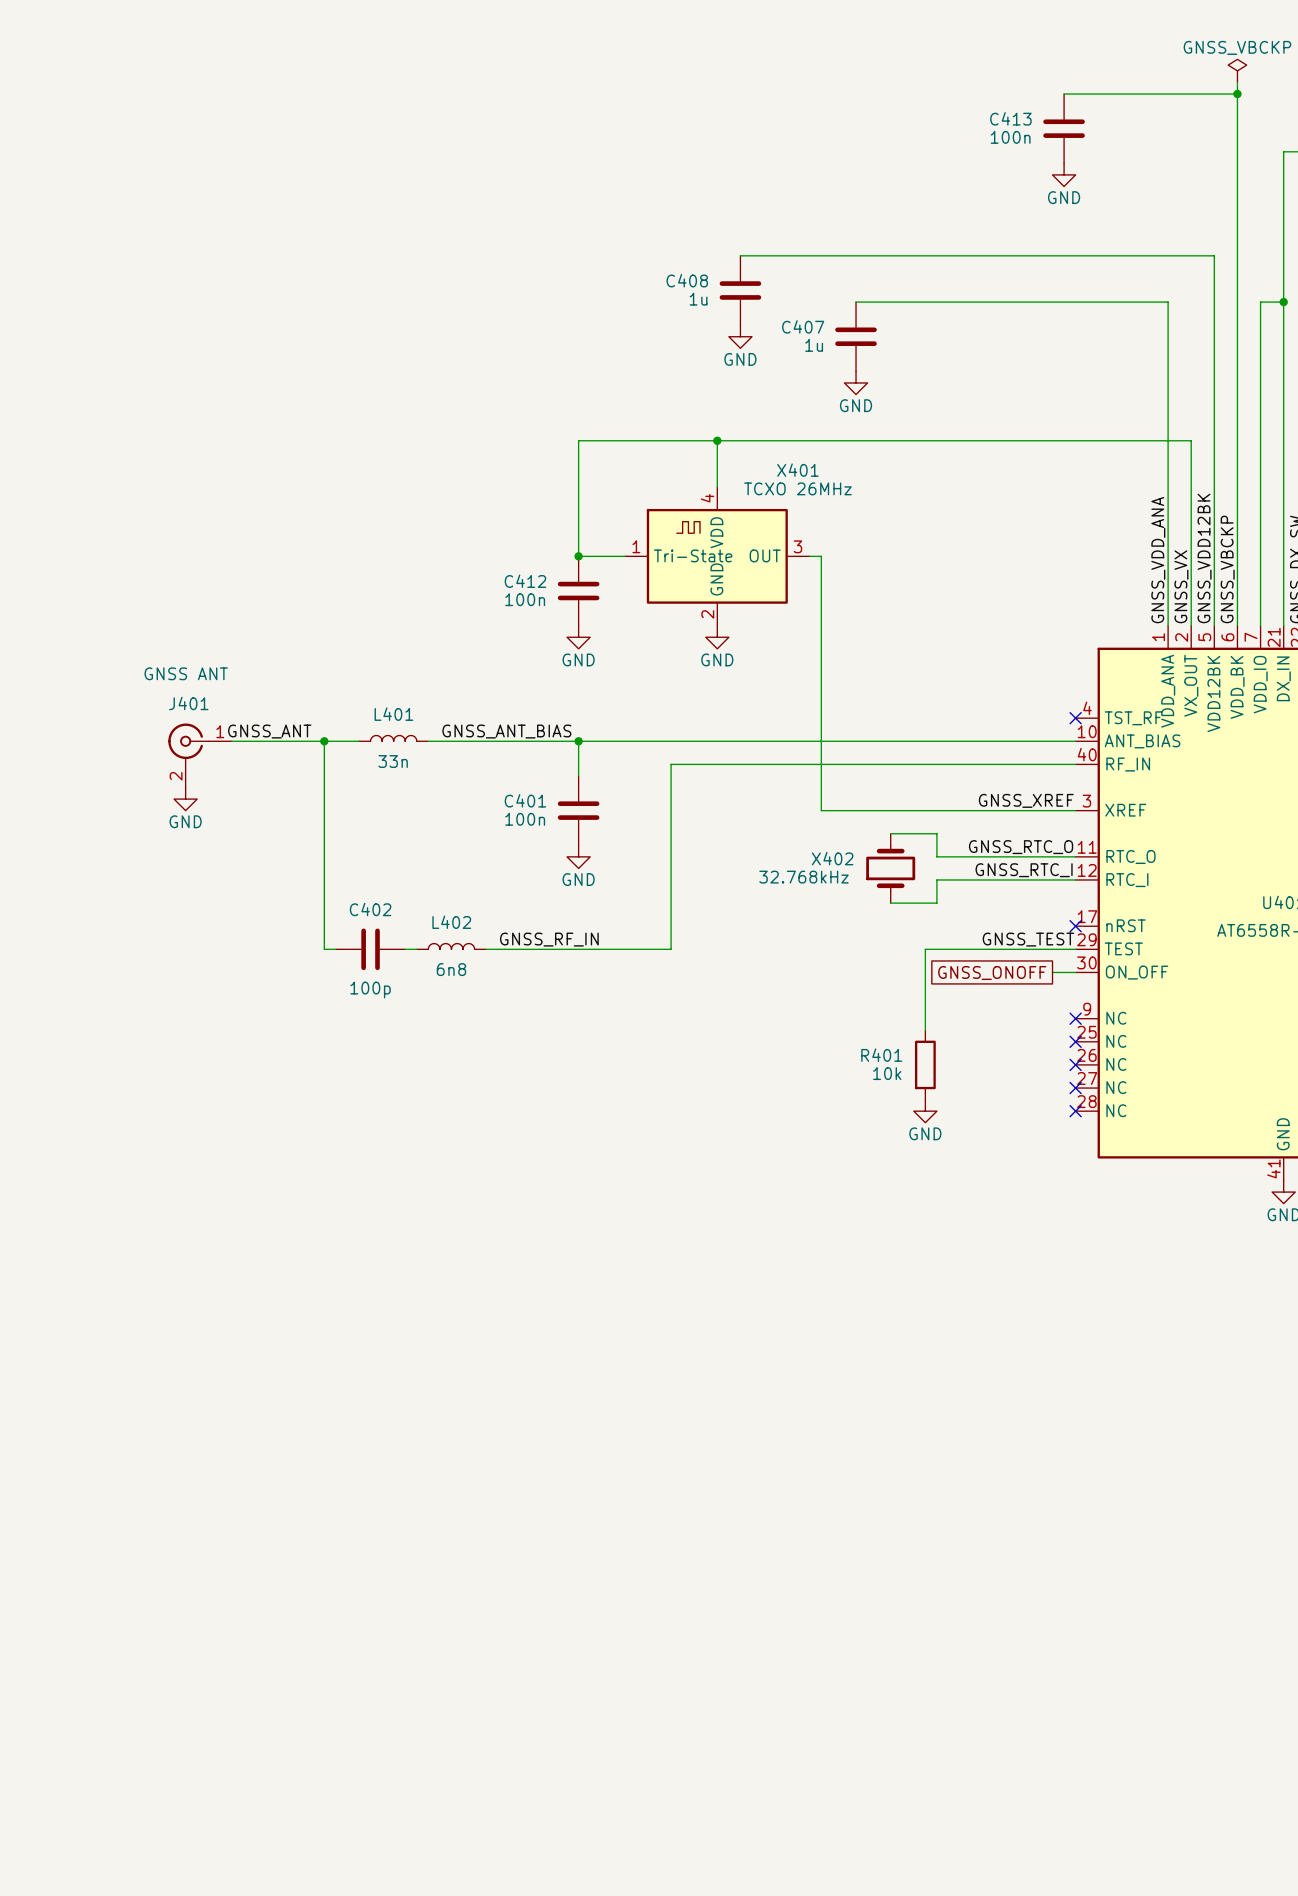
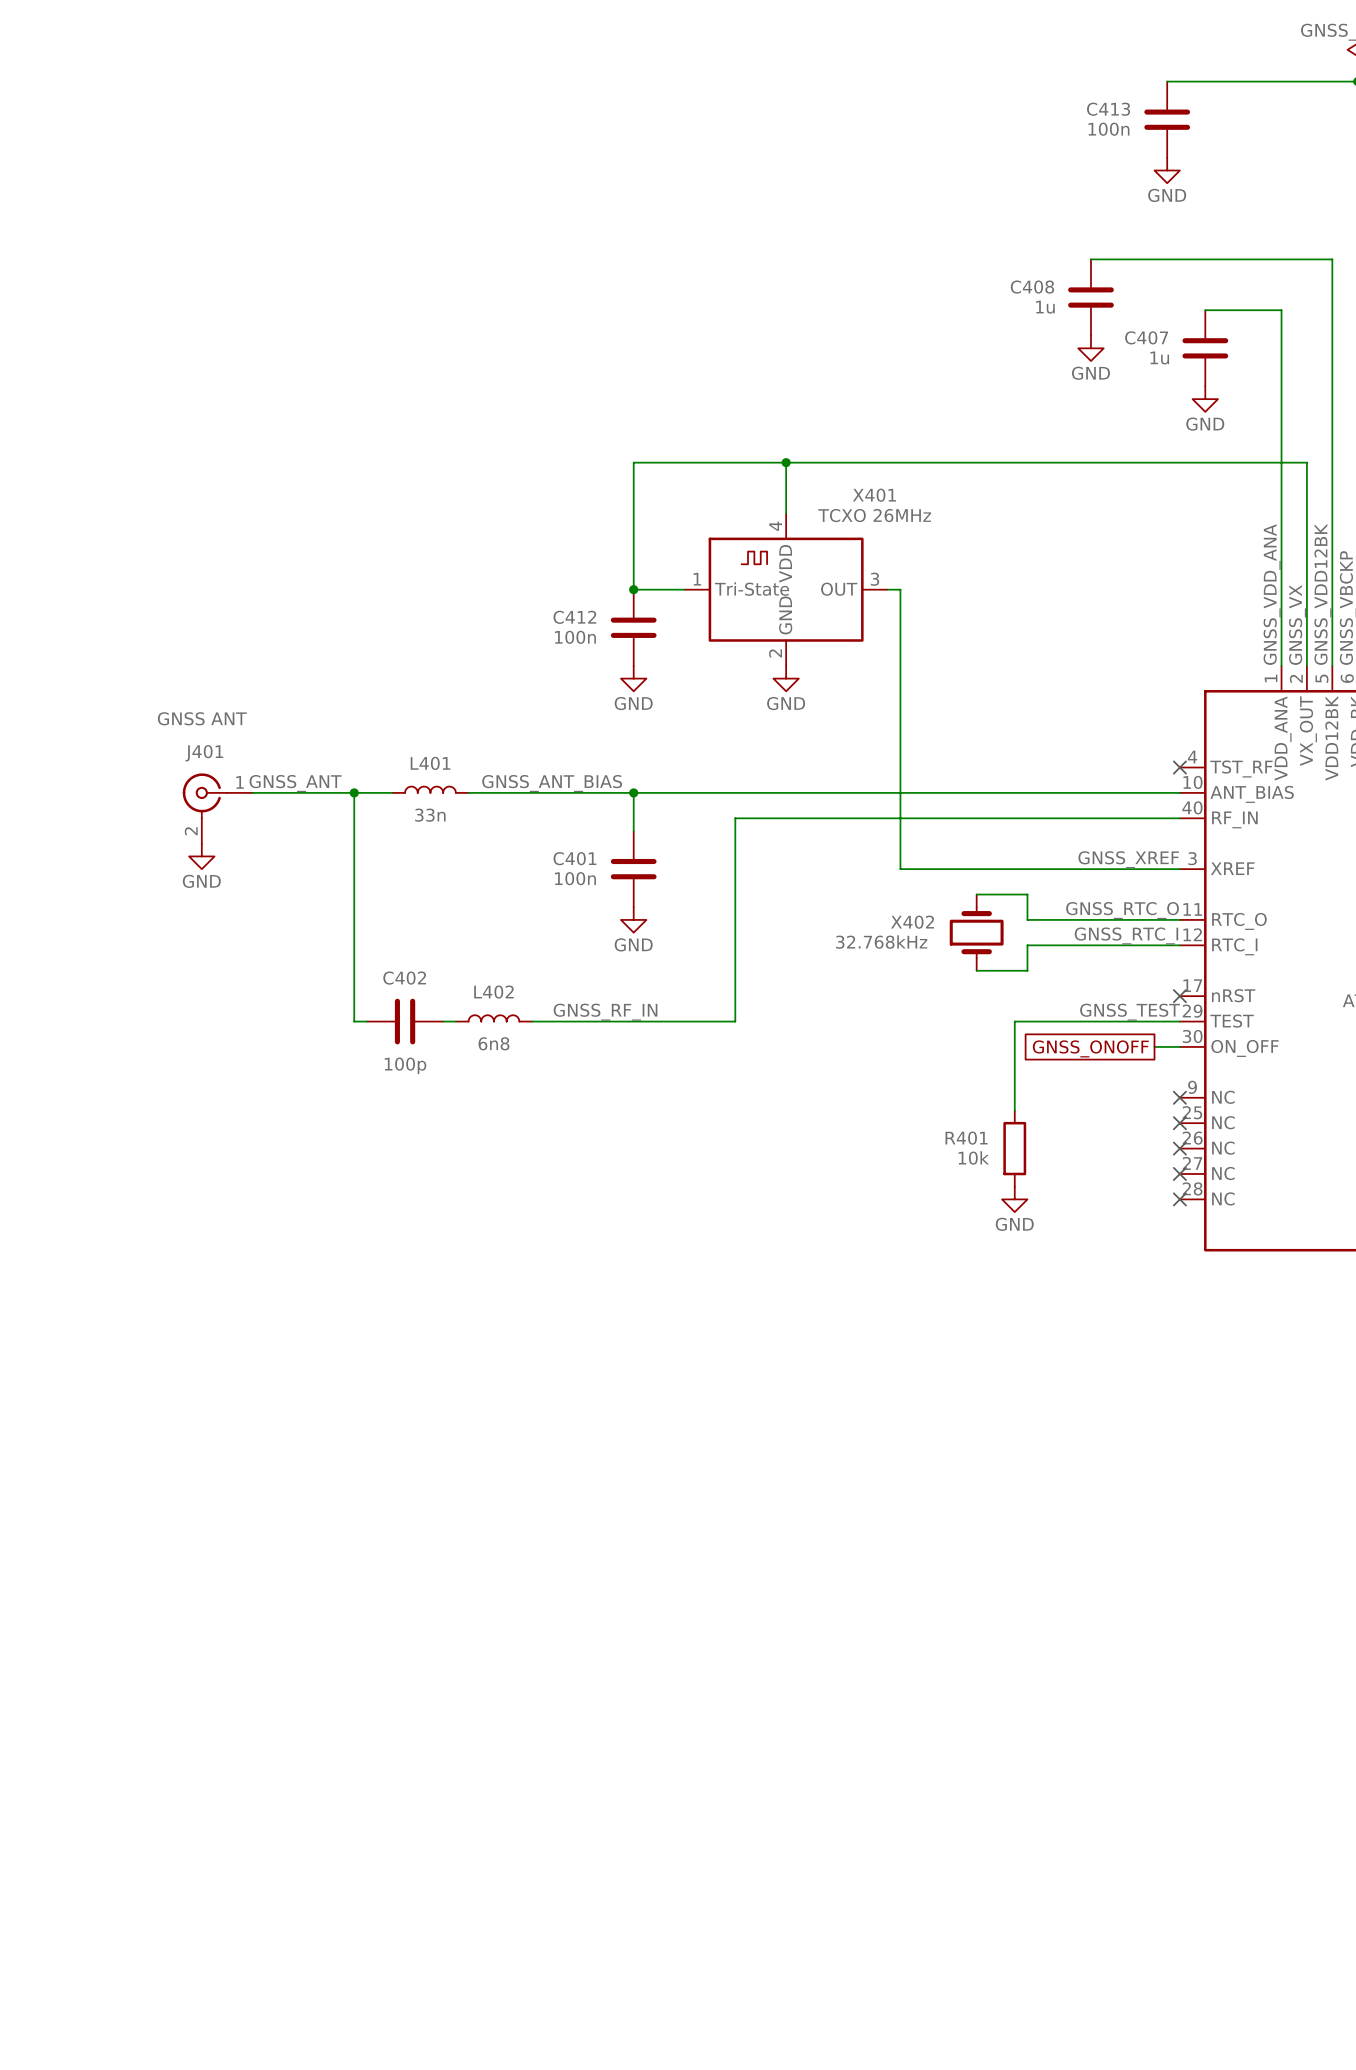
wire: (740, 255) (994, 255) -> none
C408 position: (740, 290) -> (1090, 297)
wire: (856, 302) (1098, 302) -> none
power symbol: GND (740, 336) -> none
C407 position: (856, 336) -> (1205, 348)
power symbol: none -> GND (1090, 348)
power symbol: GND (856, 382) -> none
power symbol: none -> GND (1205, 399)

